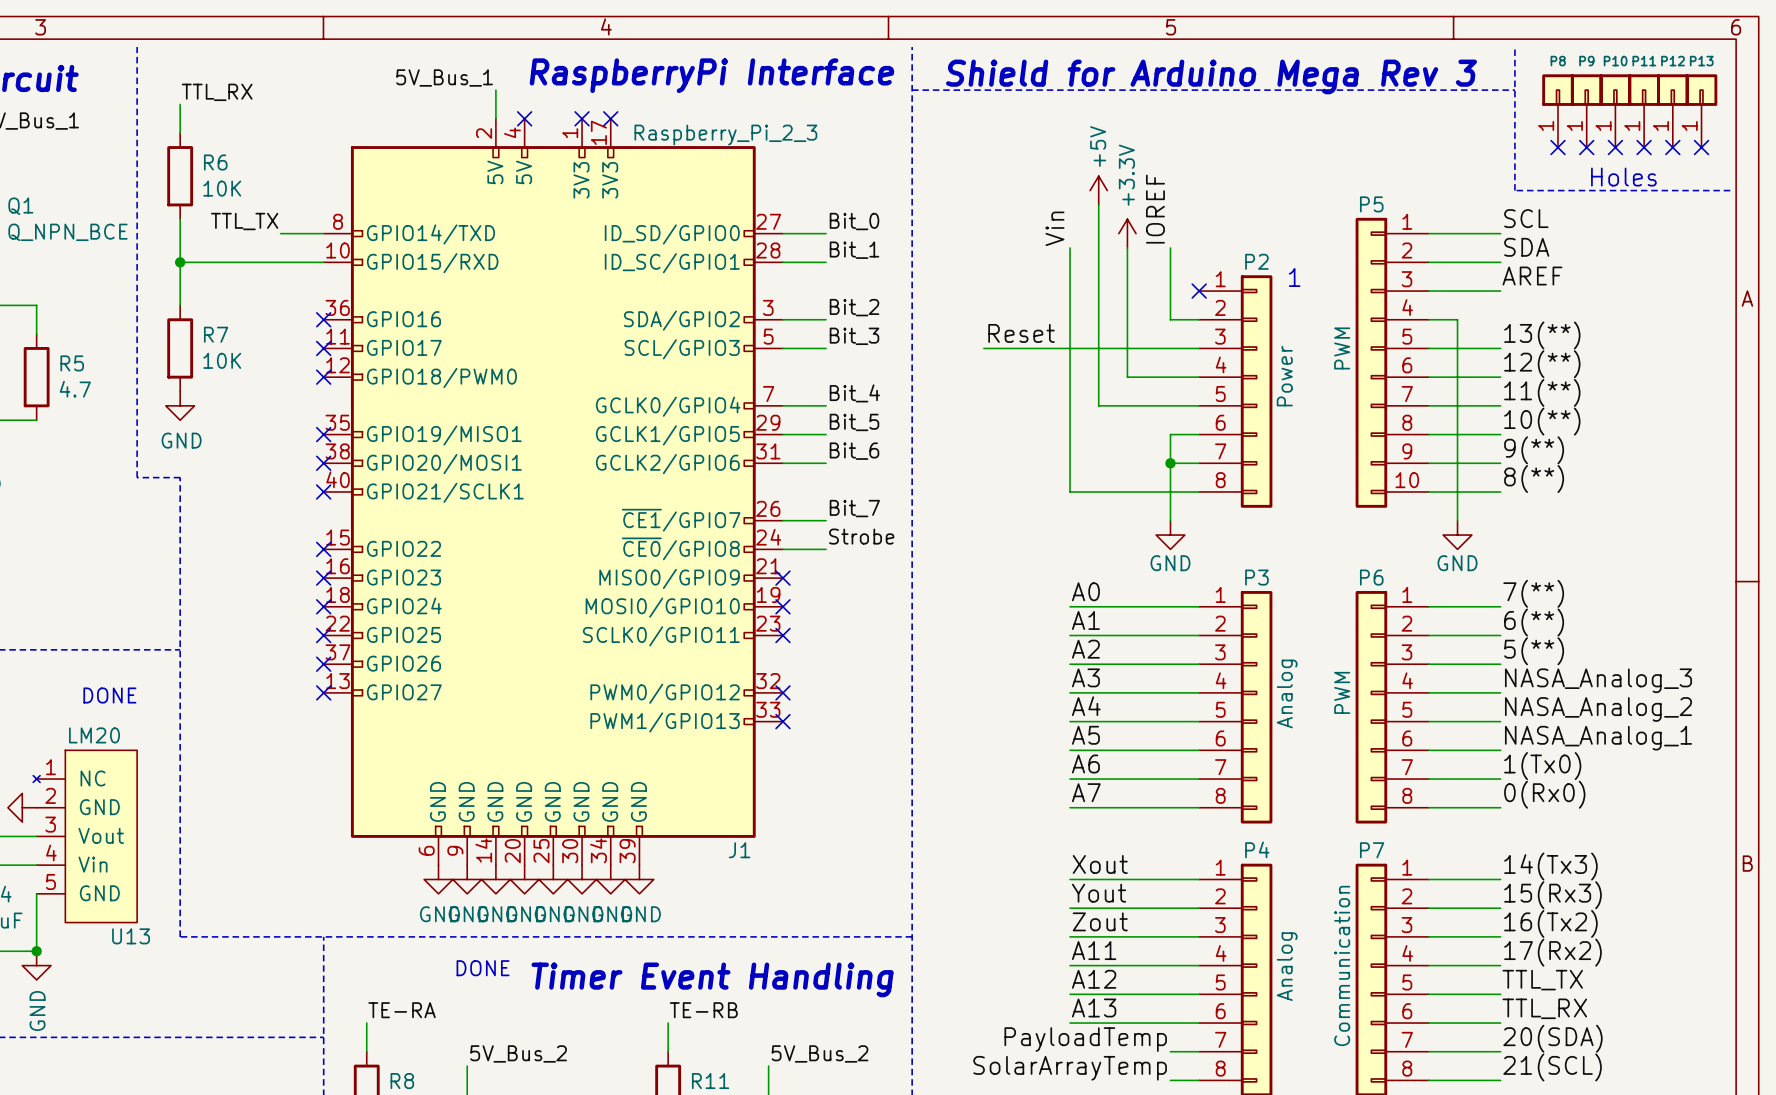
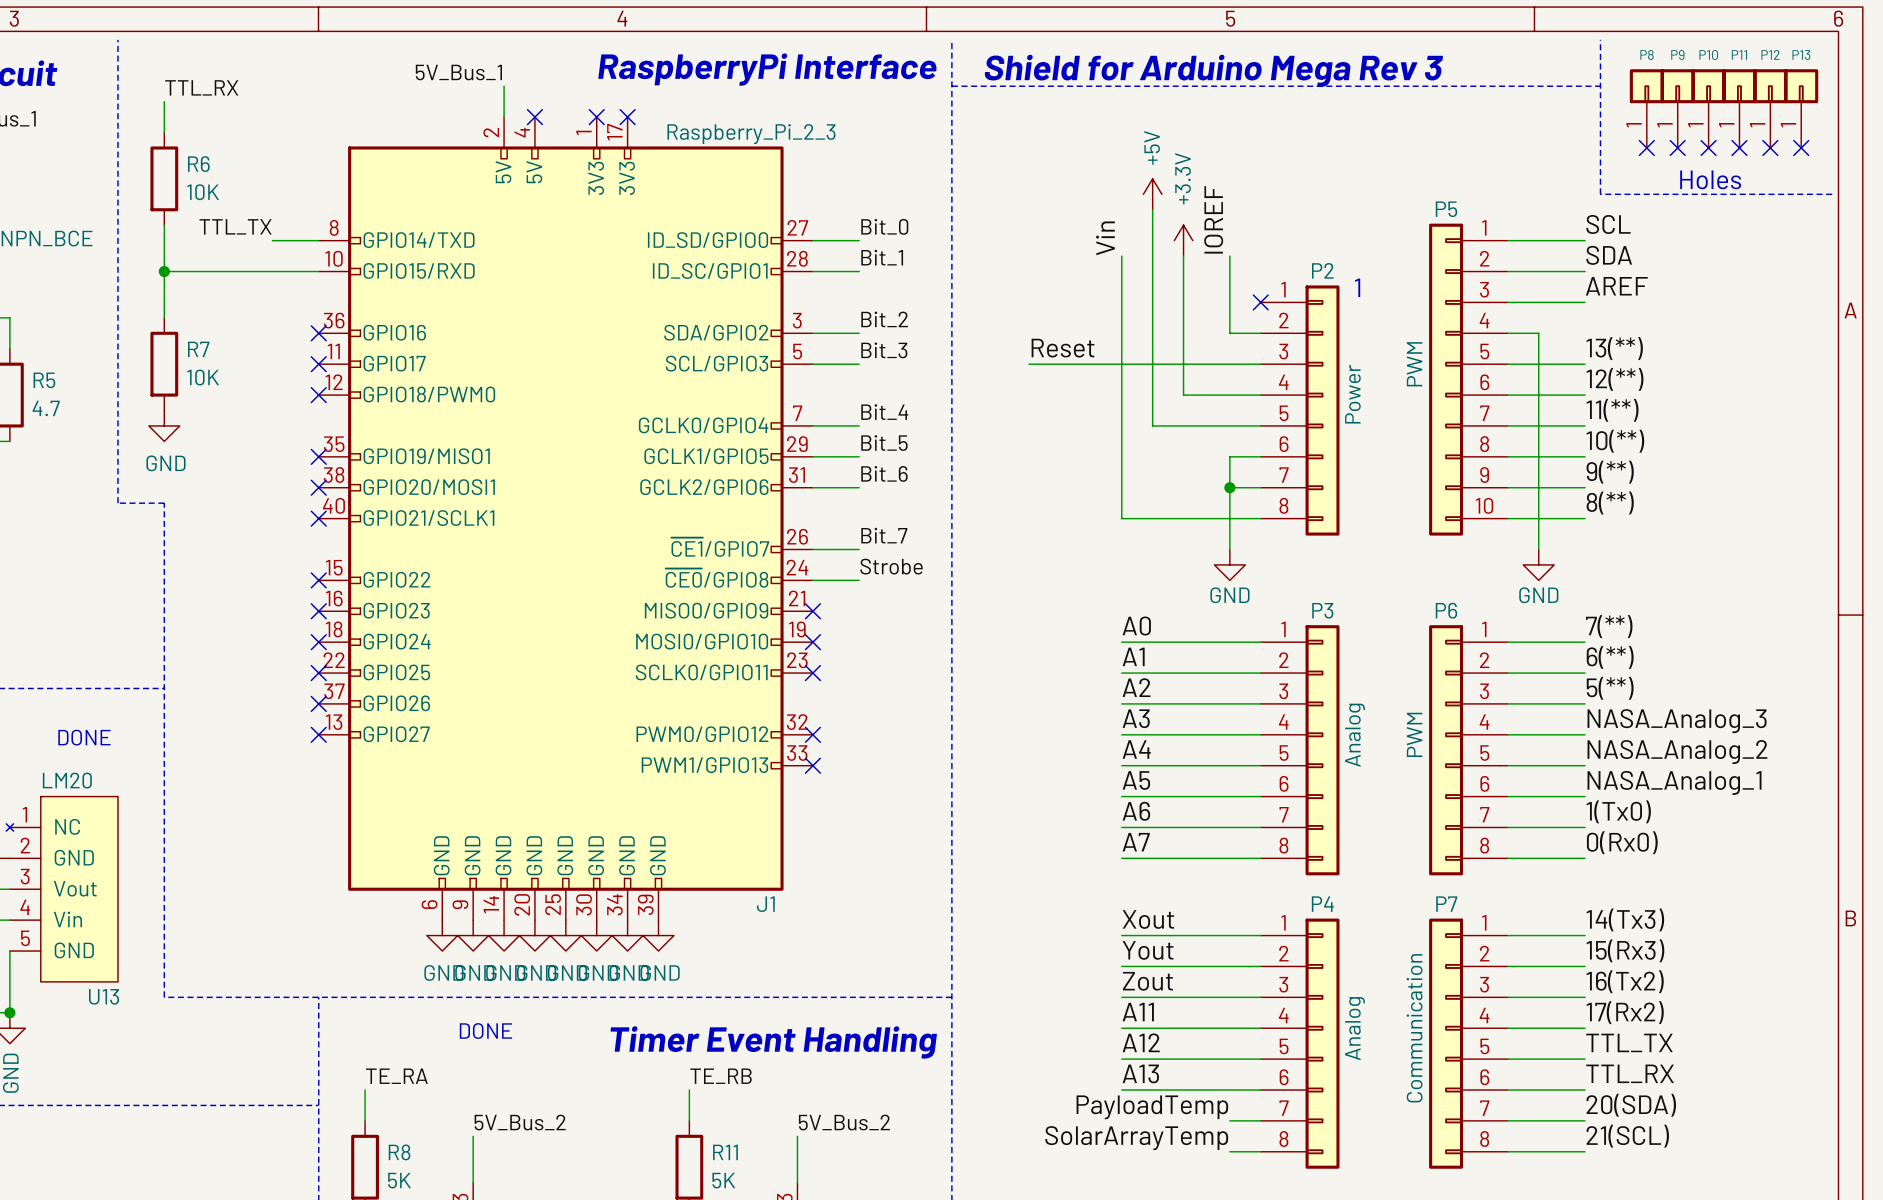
label: TE-RA (402, 1010) -> TE_RA (396, 1076)
label: TE-RB (703, 1010) -> TE_RB (721, 1076)

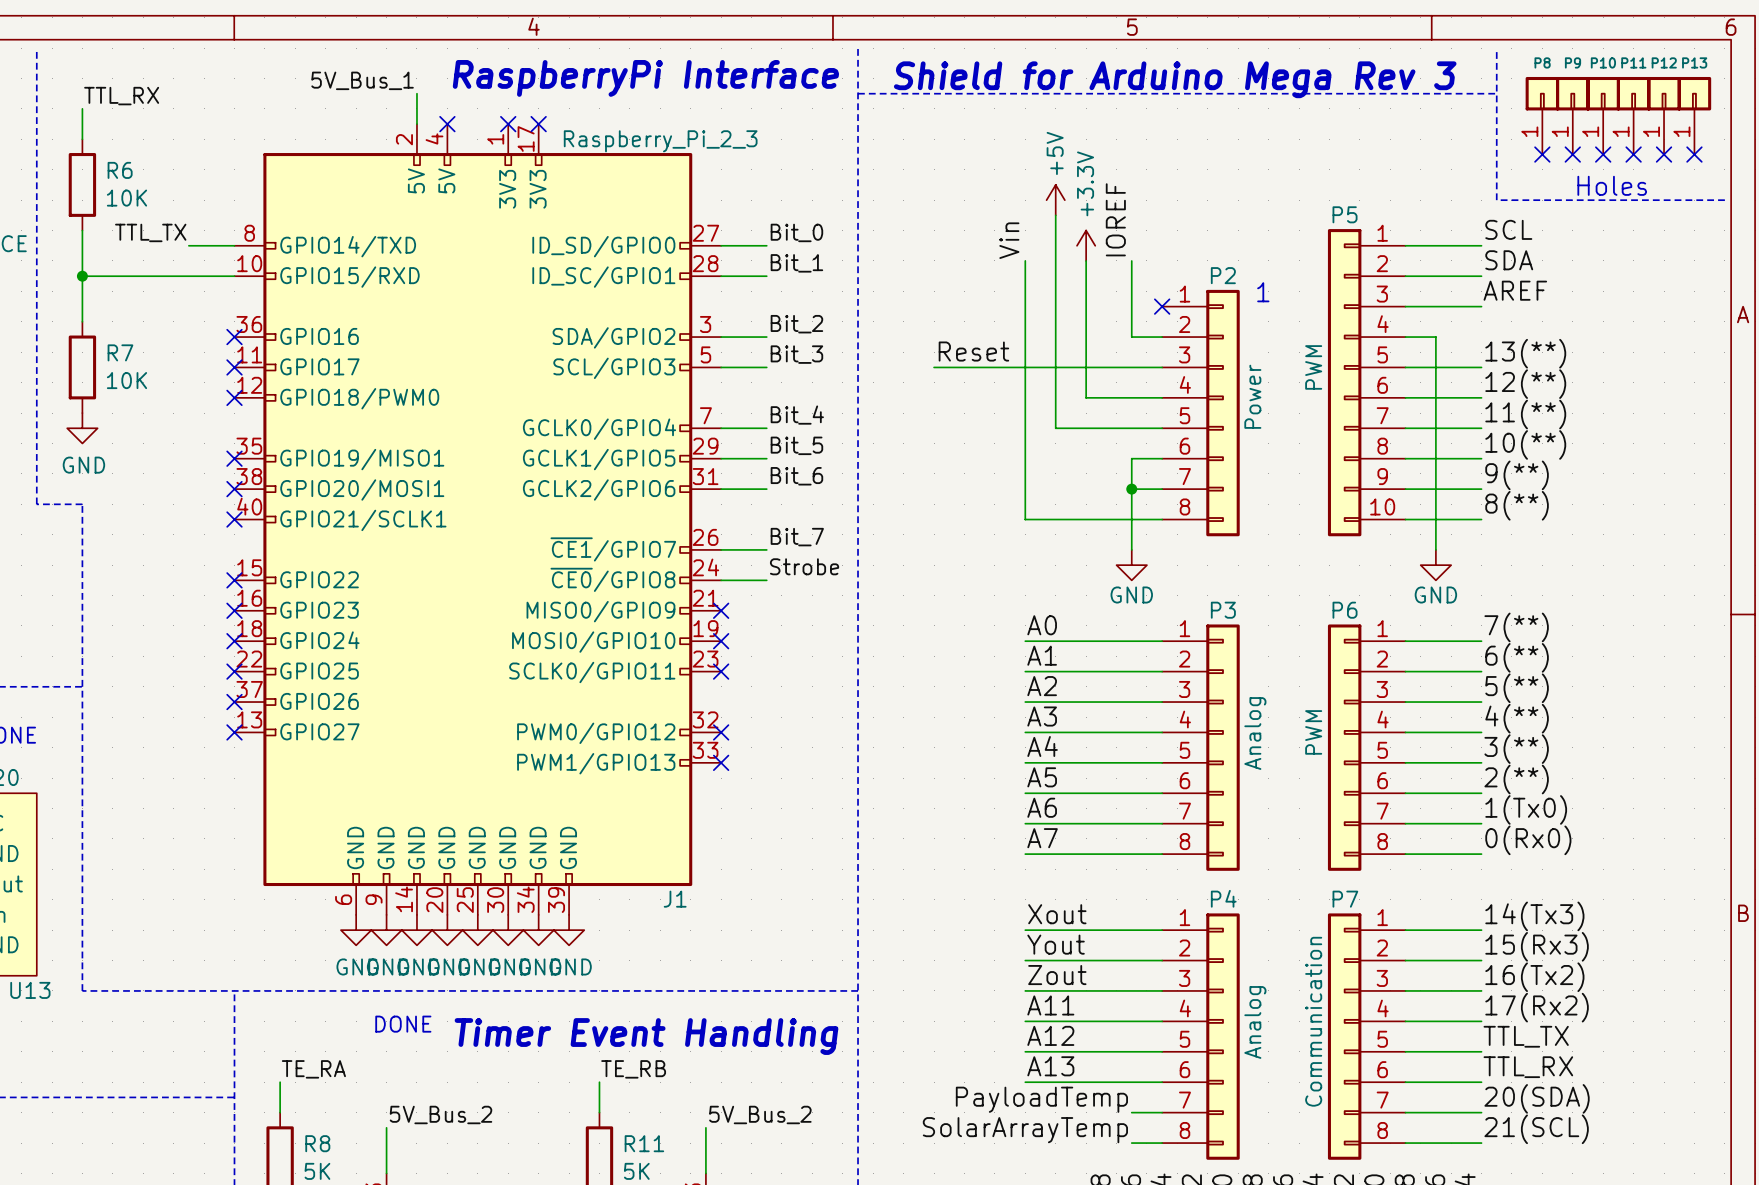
label: NASA_Analog_3 (1677, 721) -> 4(**) (1517, 718)
label: NASA_Analog_2 (1677, 752) -> 3(**) (1516, 749)
label: NASA_Analog_1 (1674, 782) -> 2(**) (1516, 779)

